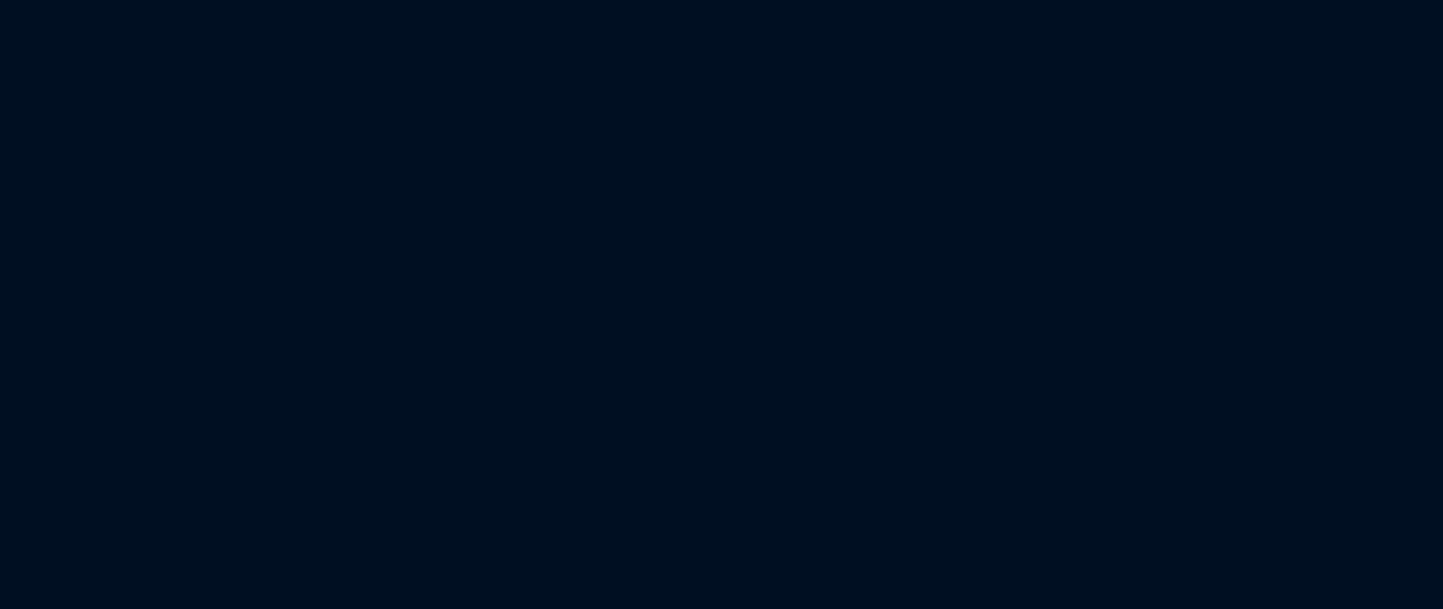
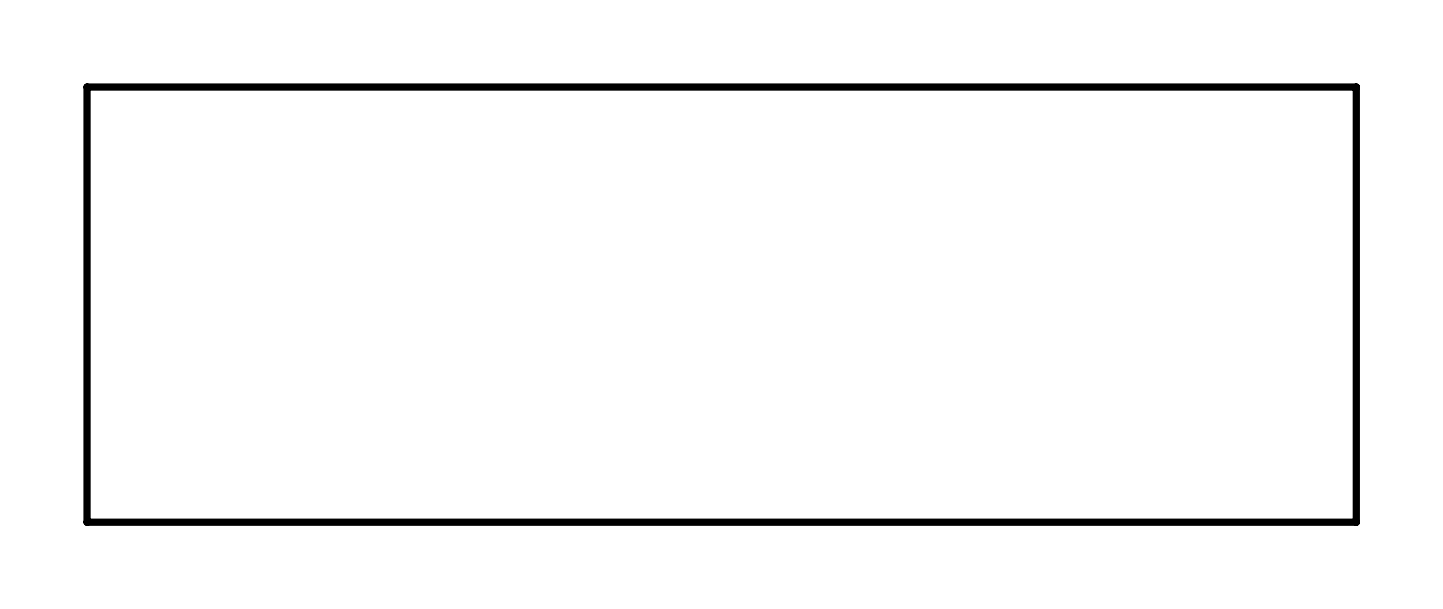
board edge: none -> (1356, 87) (87, 87) (87, 522) (1356, 522) (1356, 87)

